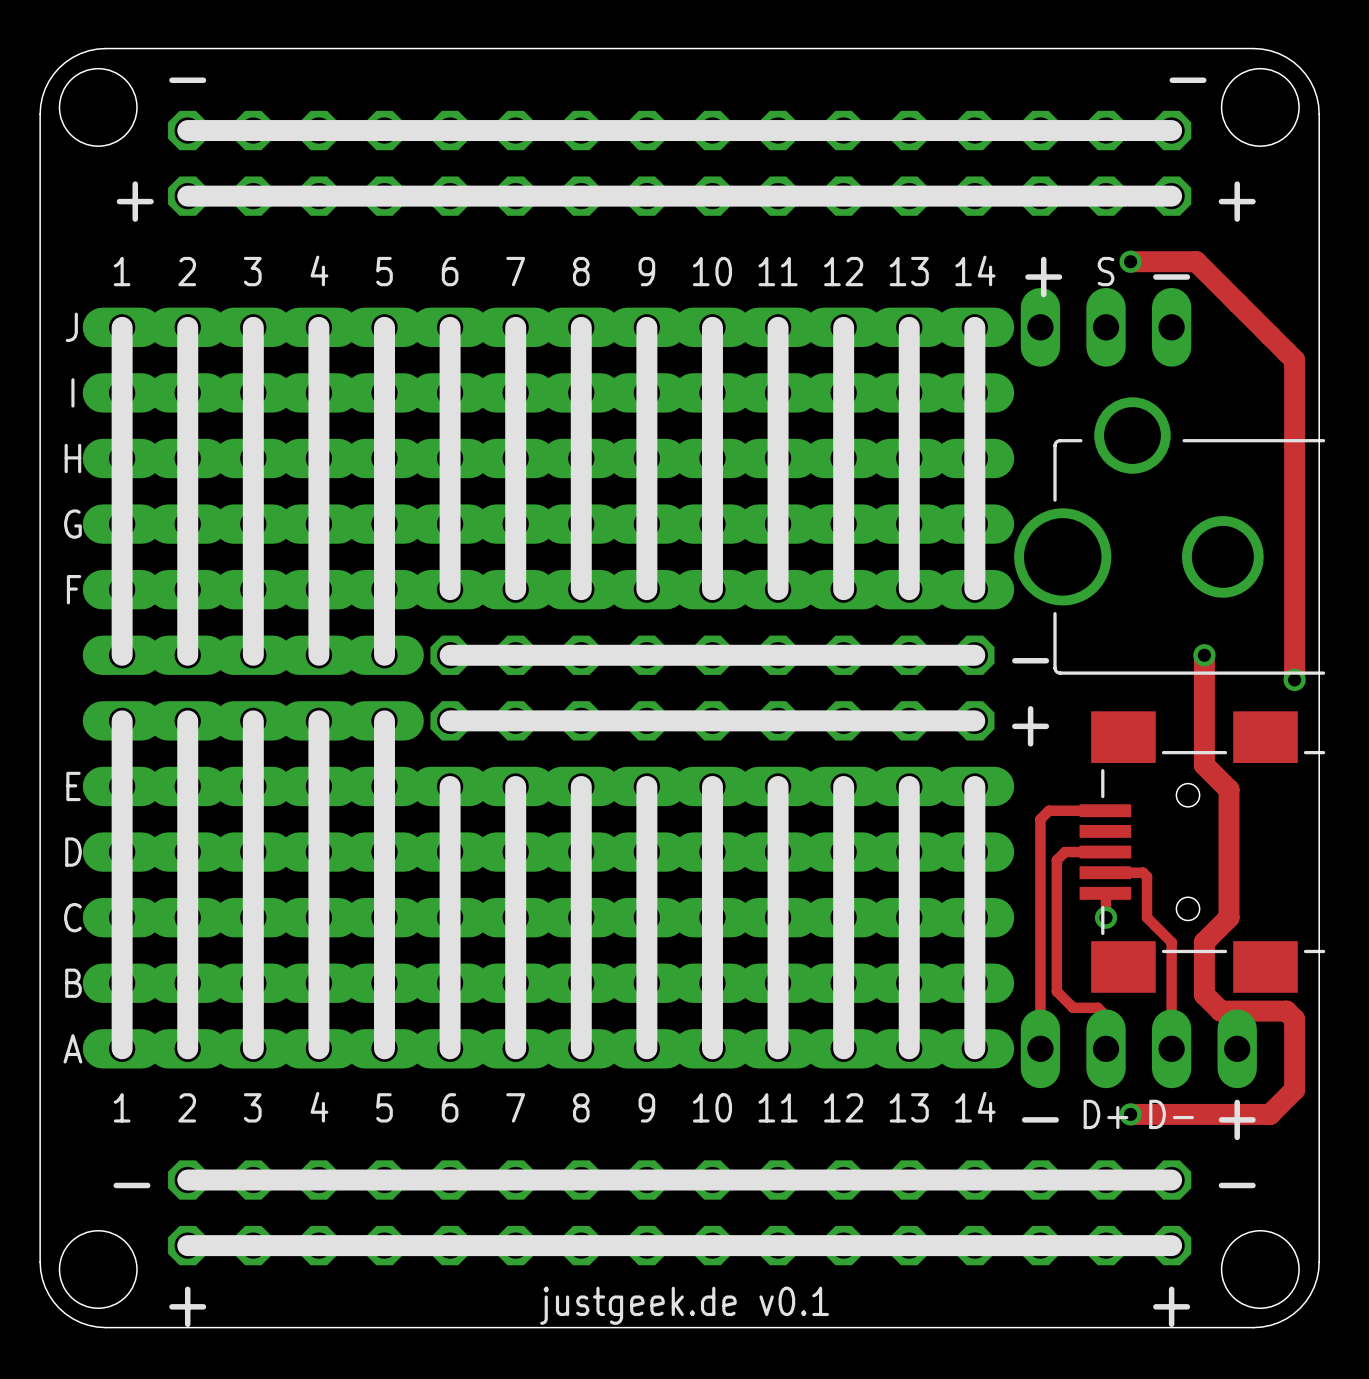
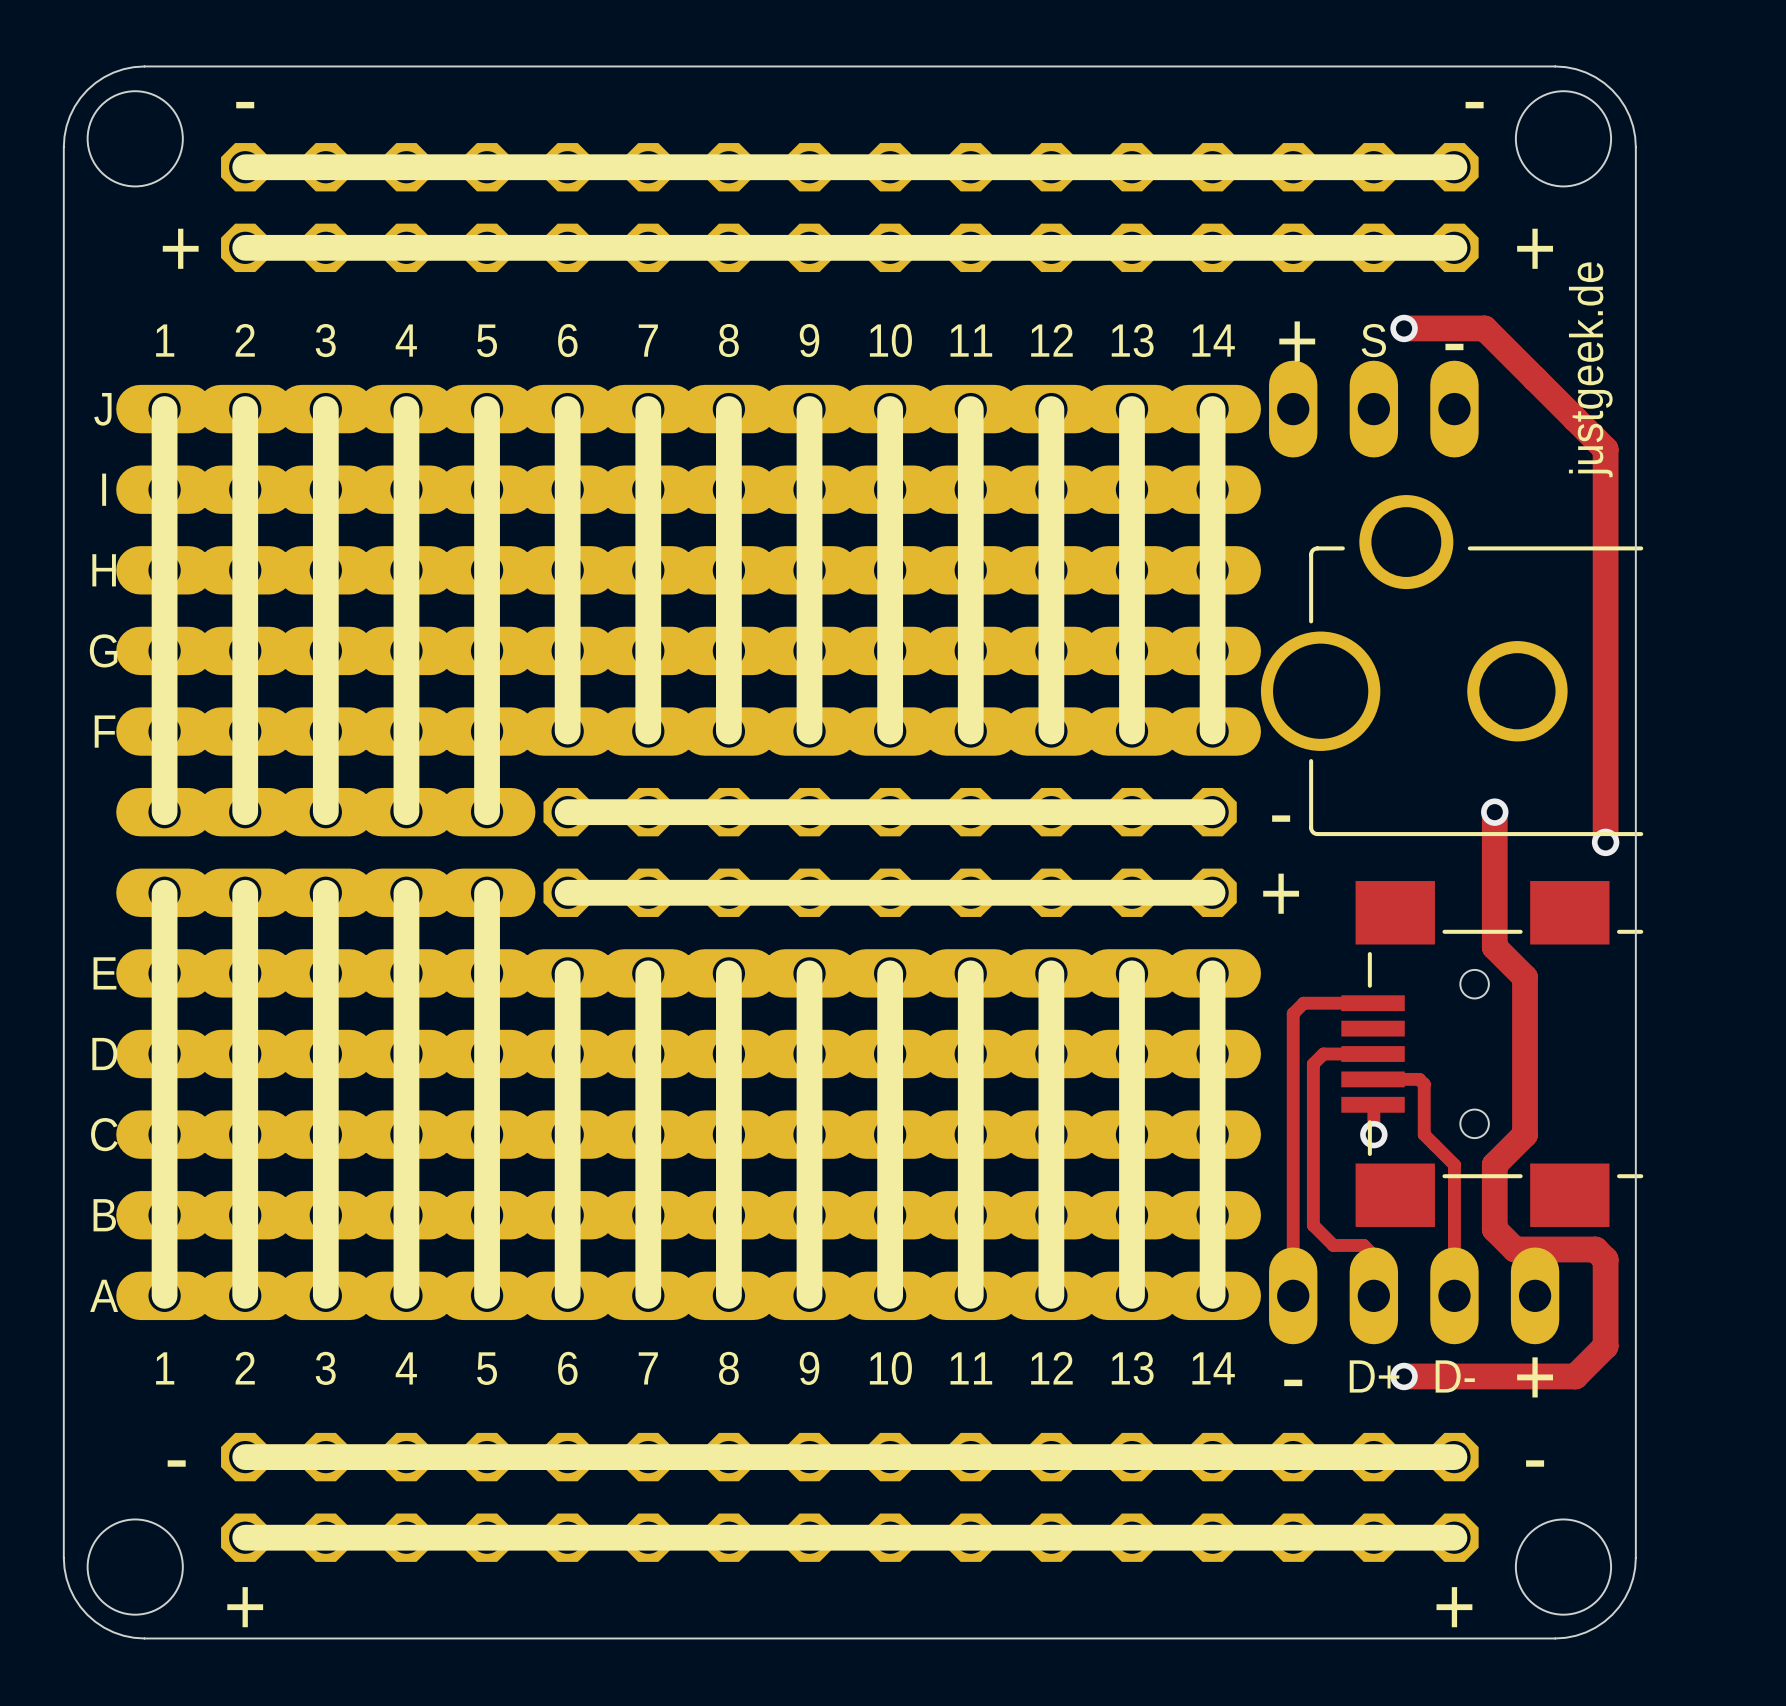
text: none -> justgeek.de (1590, 369)
text: justgeek.de v0.1 (684, 1305) -> none

